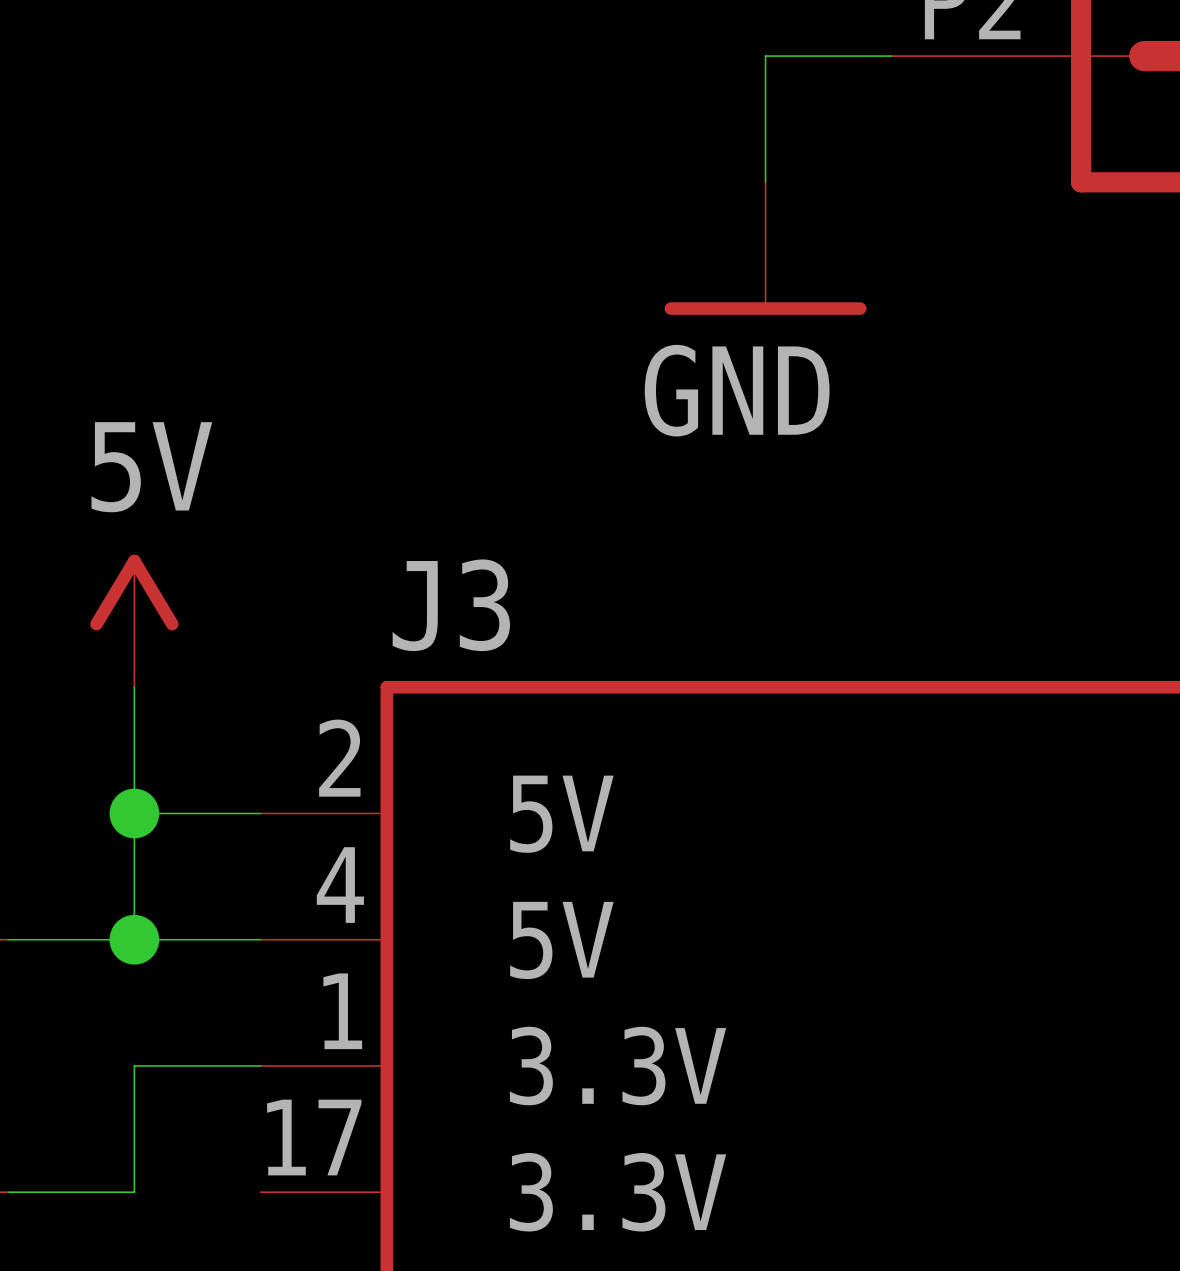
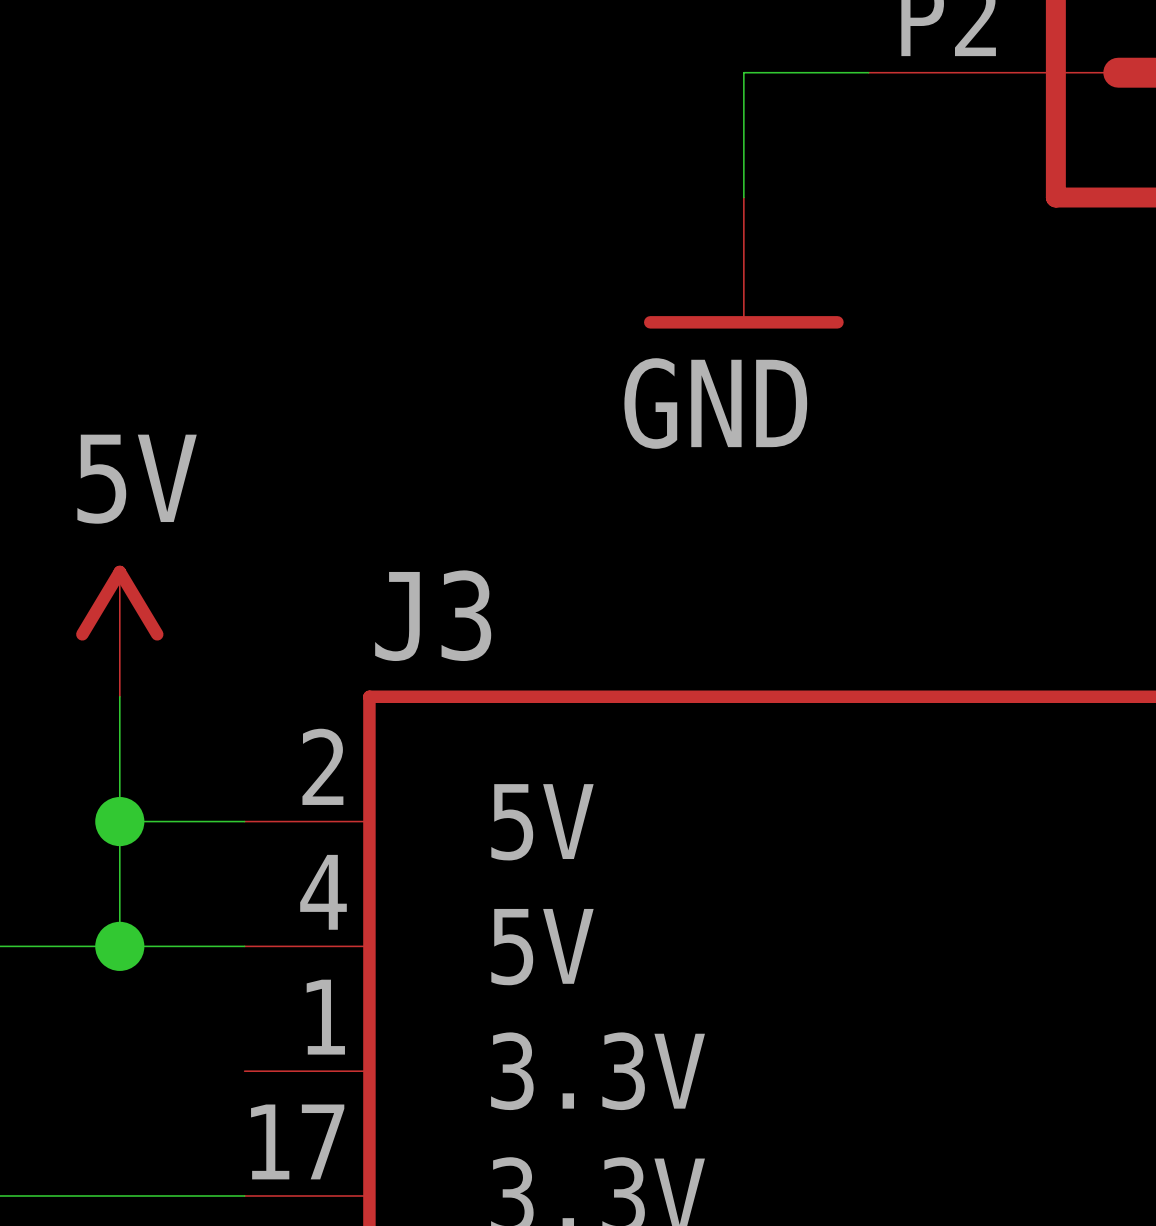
wire: (260, 1065) (134, 1065) (134, 1192) -> (244, 1195) (119, 1195)

